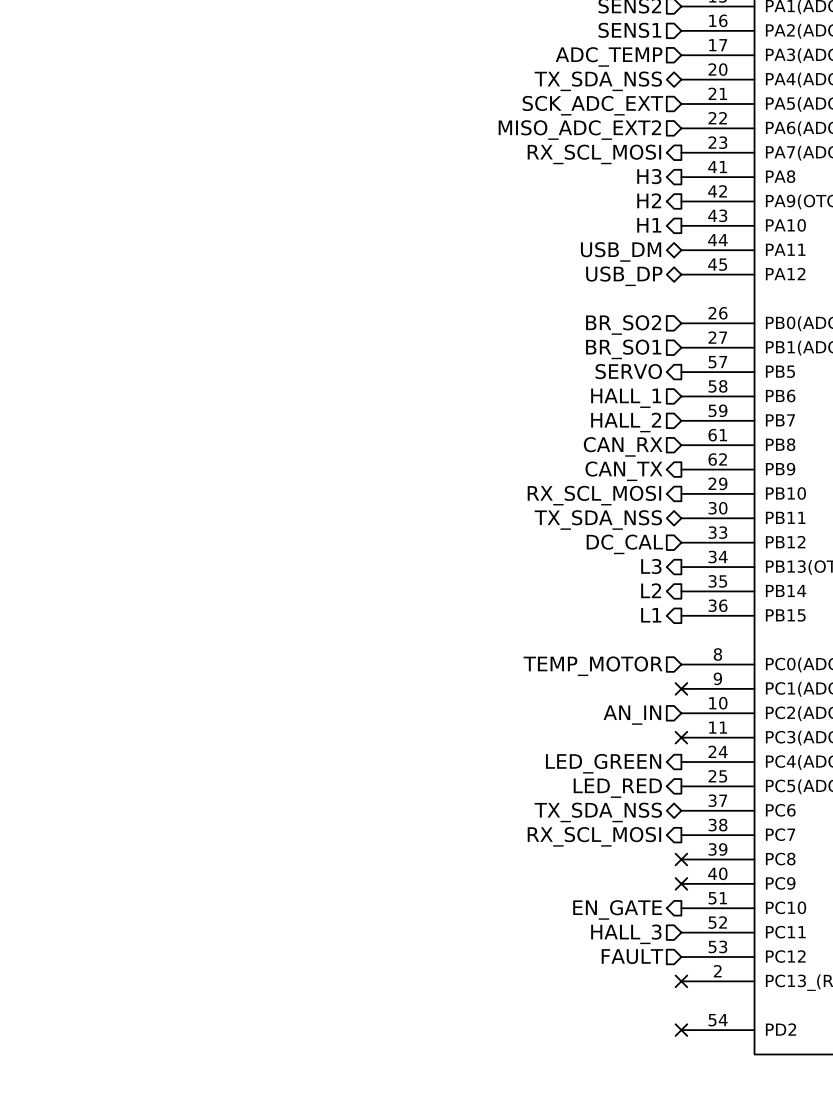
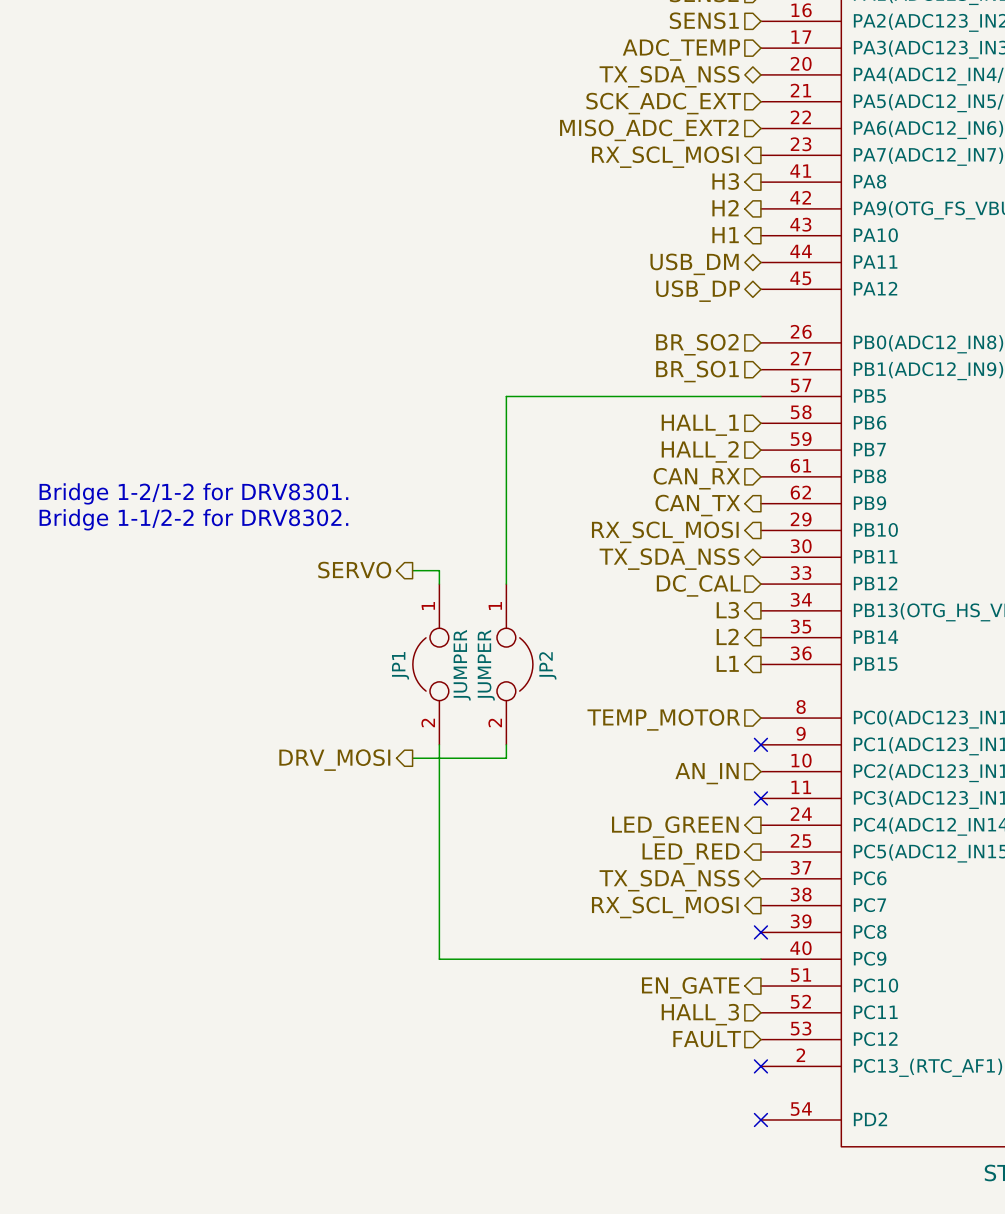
hierarchical label: SERVO (628, 371) -> none
wire: none -> (760, 396) (506, 396) (506, 584)
text: none -> Bridge 1-2/1-2 for DRV8301. (193, 493)
text: none -> Bridge 1-1/2-2 for DRV8302. (193, 519)
hierarchical label: none -> SERVO (354, 570)
wire: none -> (412, 570) (439, 570) (439, 584)
JP1: none -> JUMPER (430, 664)
JP2: none -> JUMPER (514, 664)
wire: none -> (439, 744) (439, 959) (760, 959)
wire: none -> (506, 744) (506, 758) (412, 758)
hierarchical label: none -> DRV_MOSI (334, 760)
no-connect mark: (681, 883) -> none

